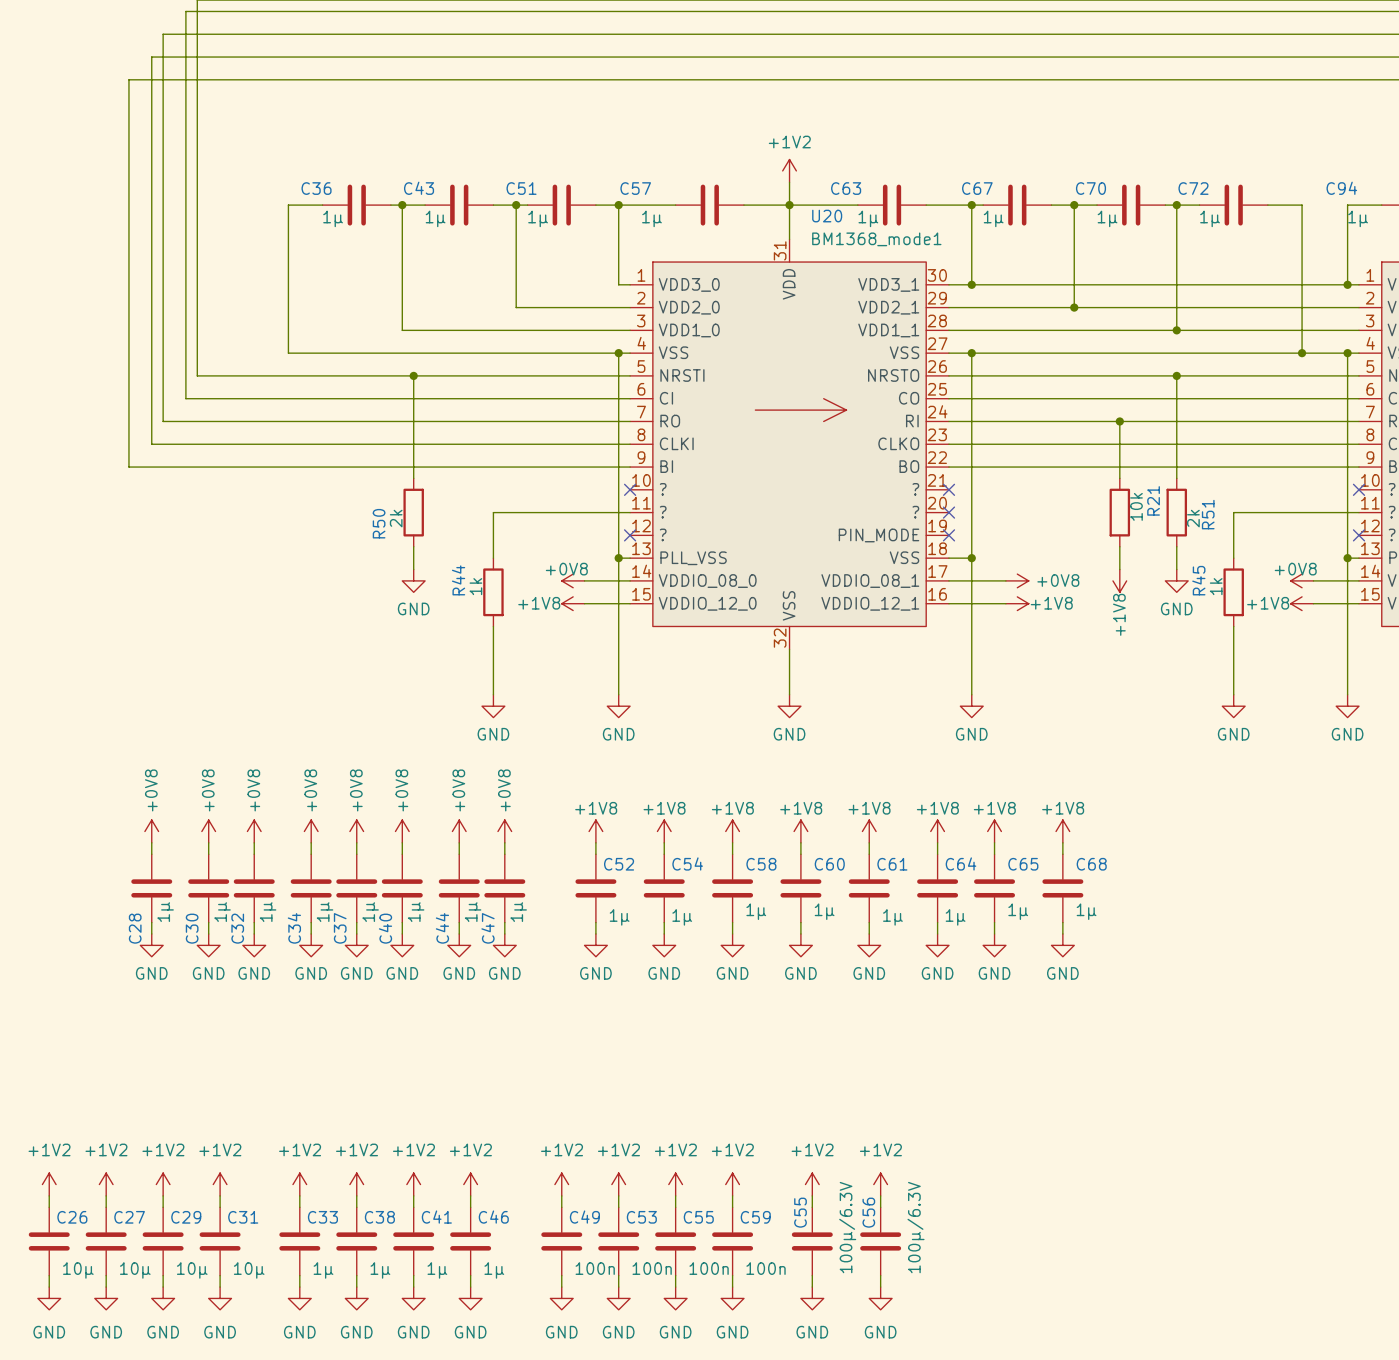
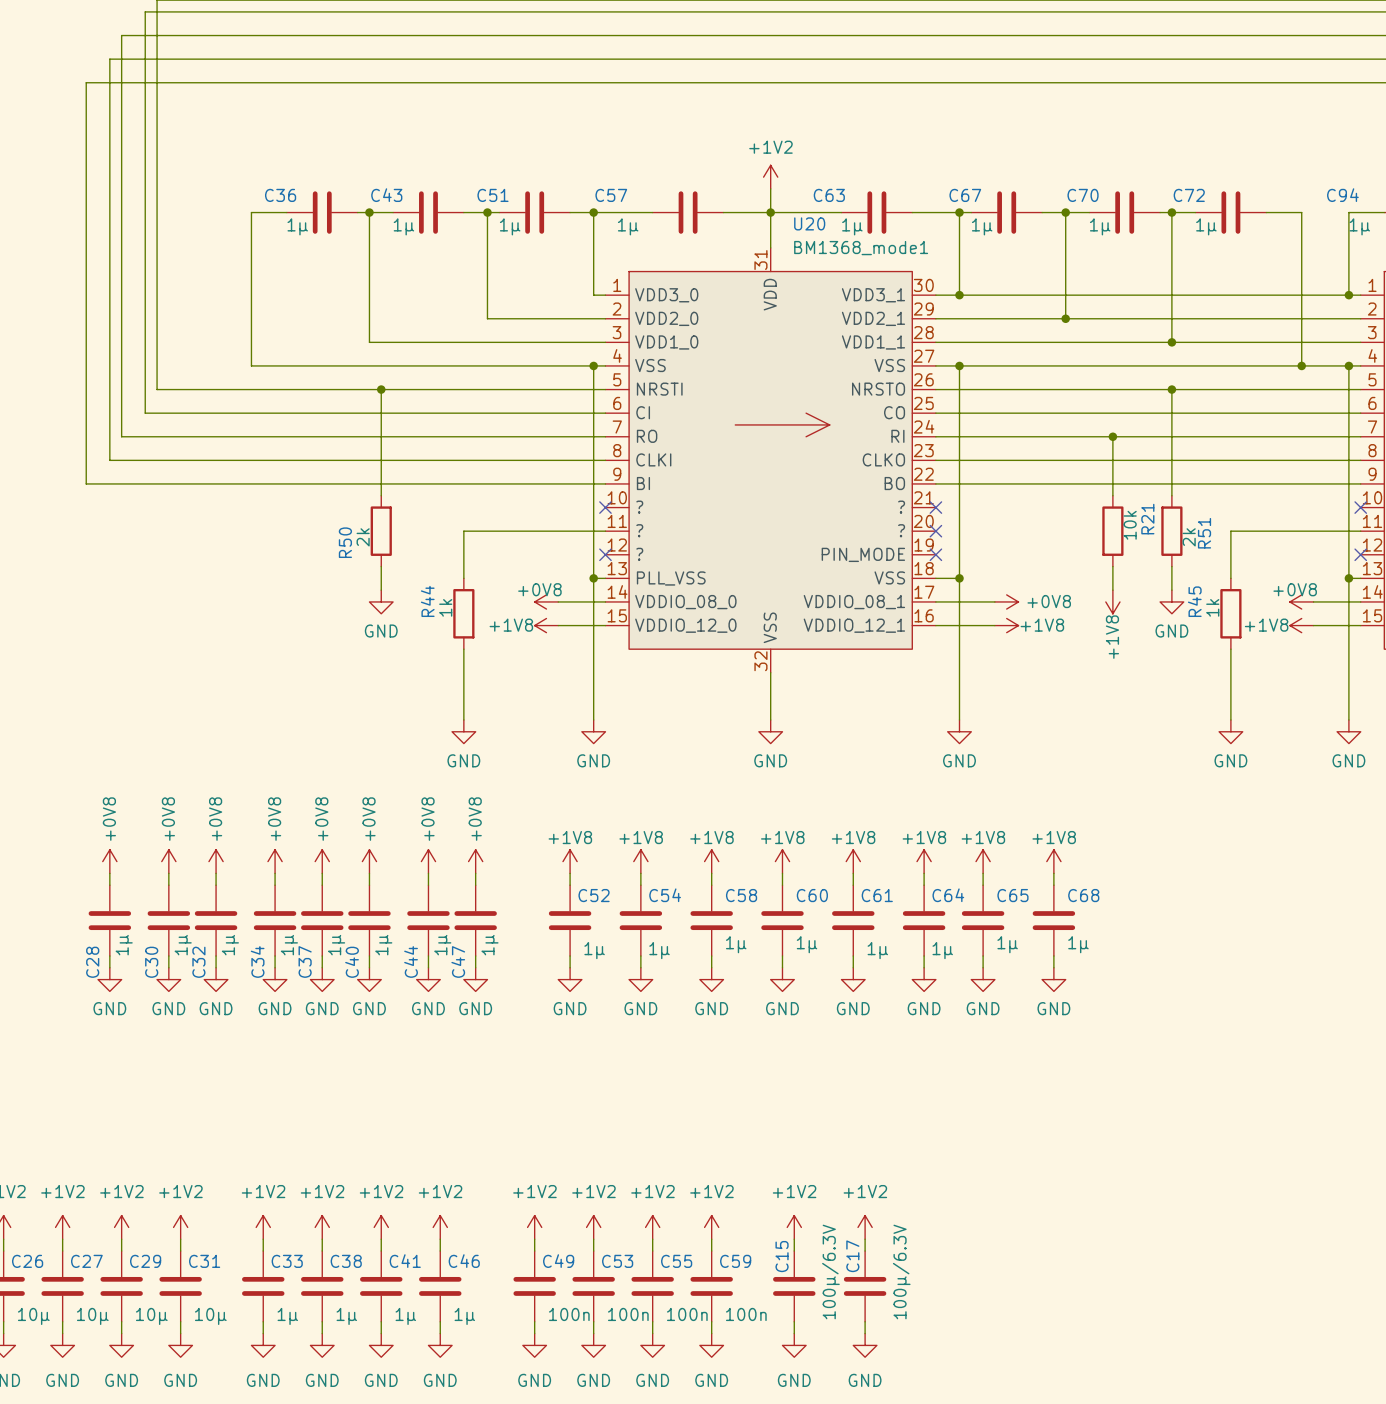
C55 name: C55 (800, 1212) -> C15 (782, 1256)
C56 name: C56 (868, 1212) -> C17 (852, 1256)

